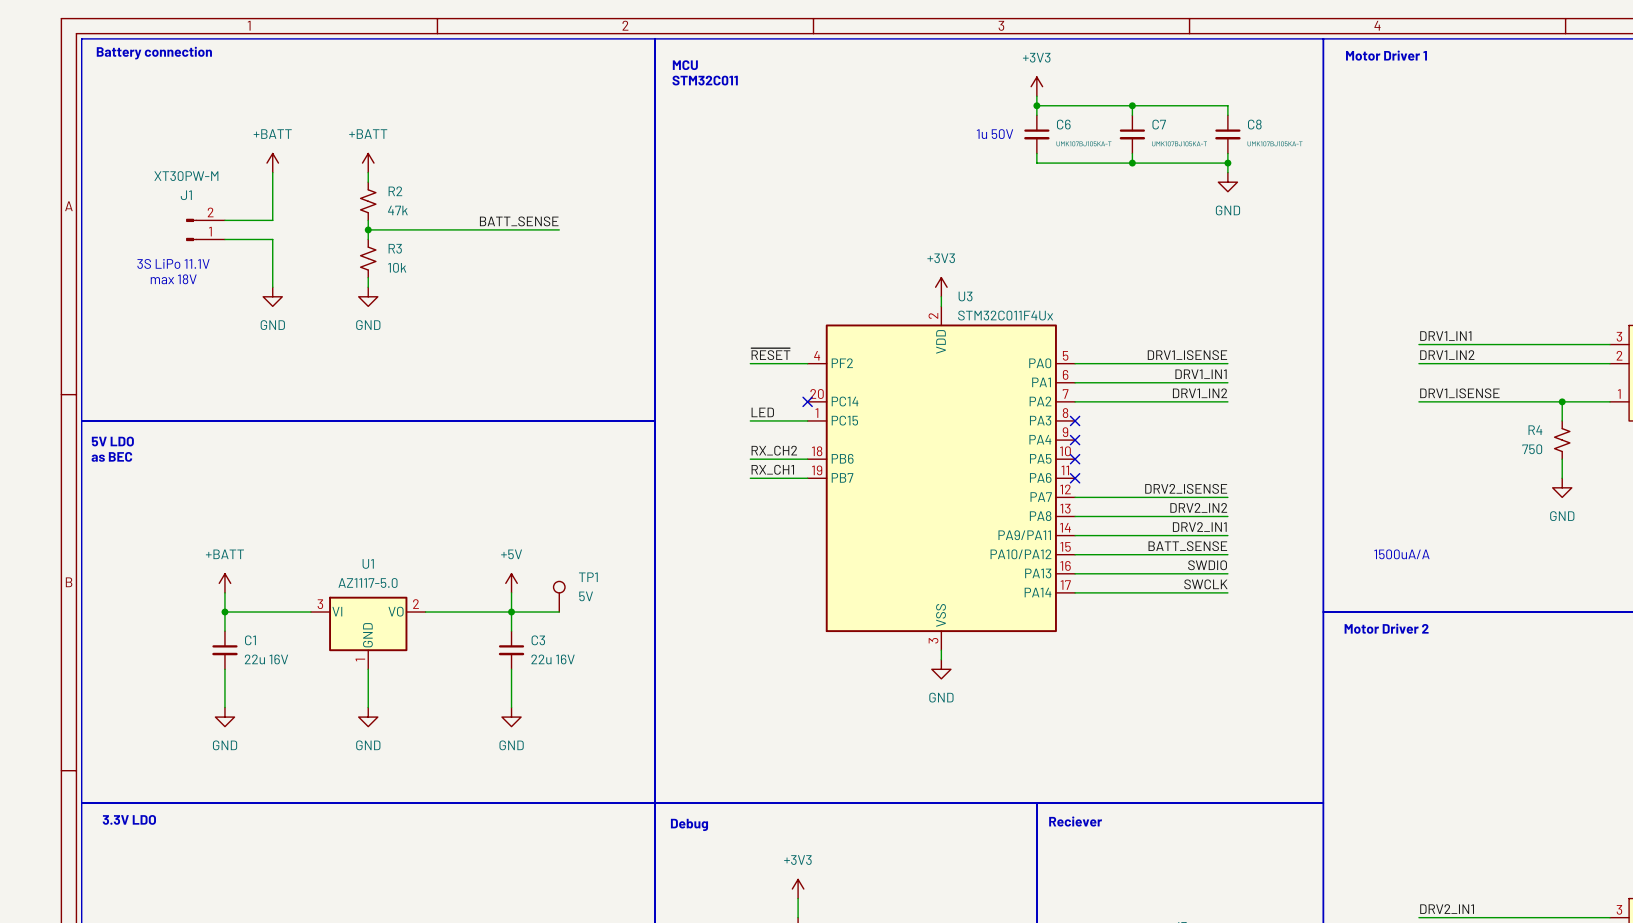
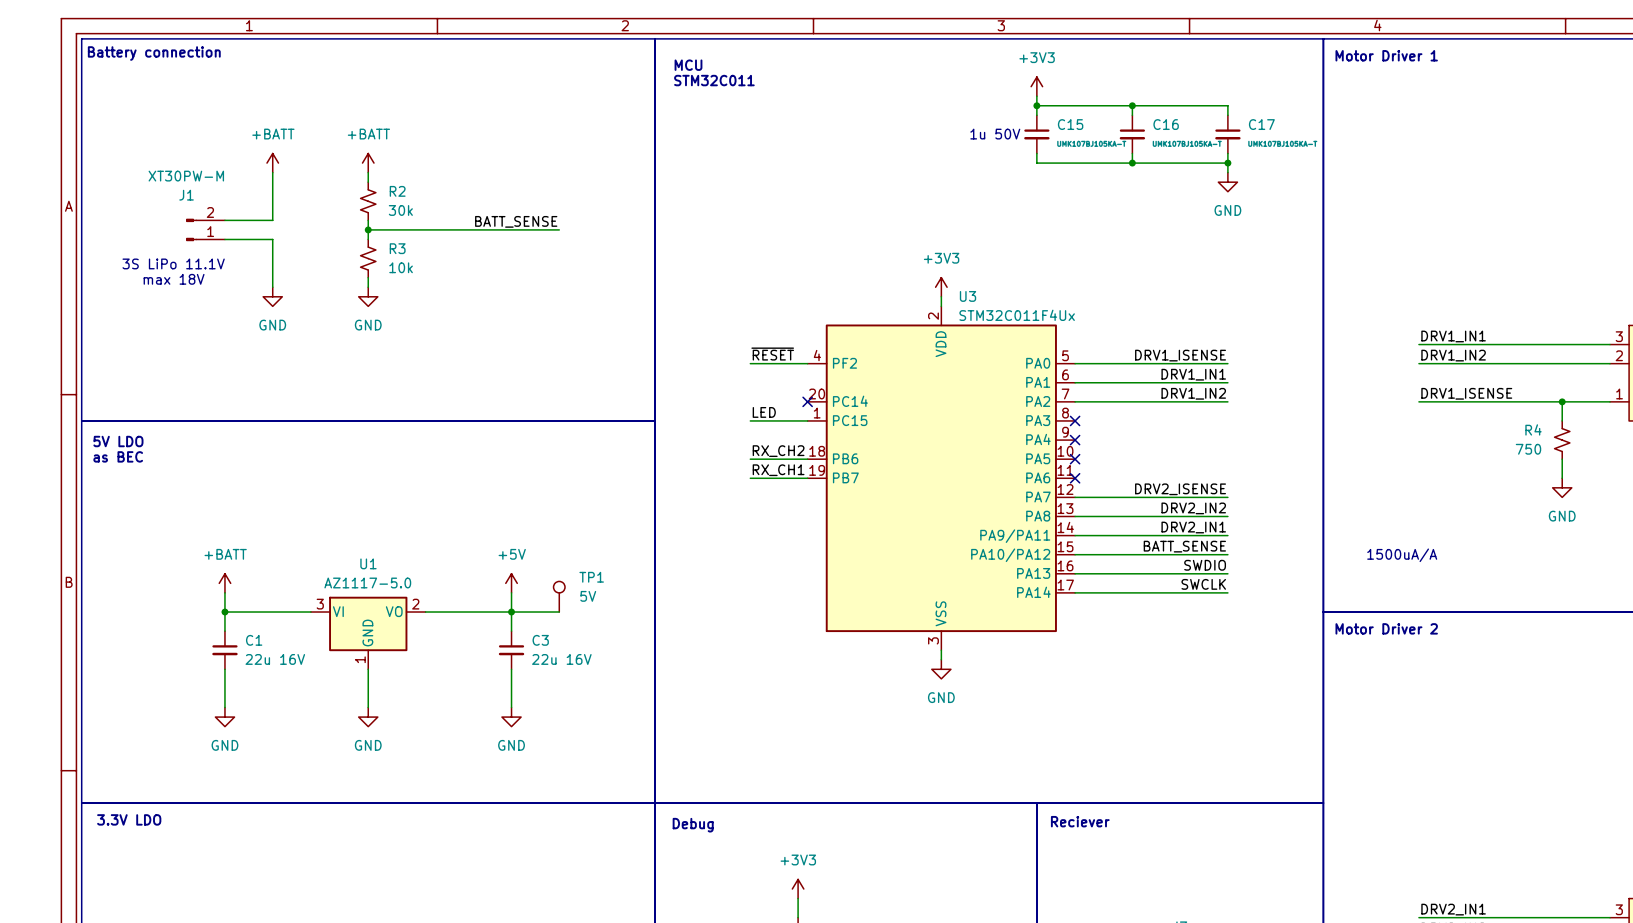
C6 name: C6 (1063, 124) -> C15 (1070, 124)
C7 name: C7 (1159, 124) -> C16 (1166, 124)
C8 name: C8 (1254, 124) -> C17 (1261, 124)
R2 value: 47k (397, 210) -> 30k (400, 210)

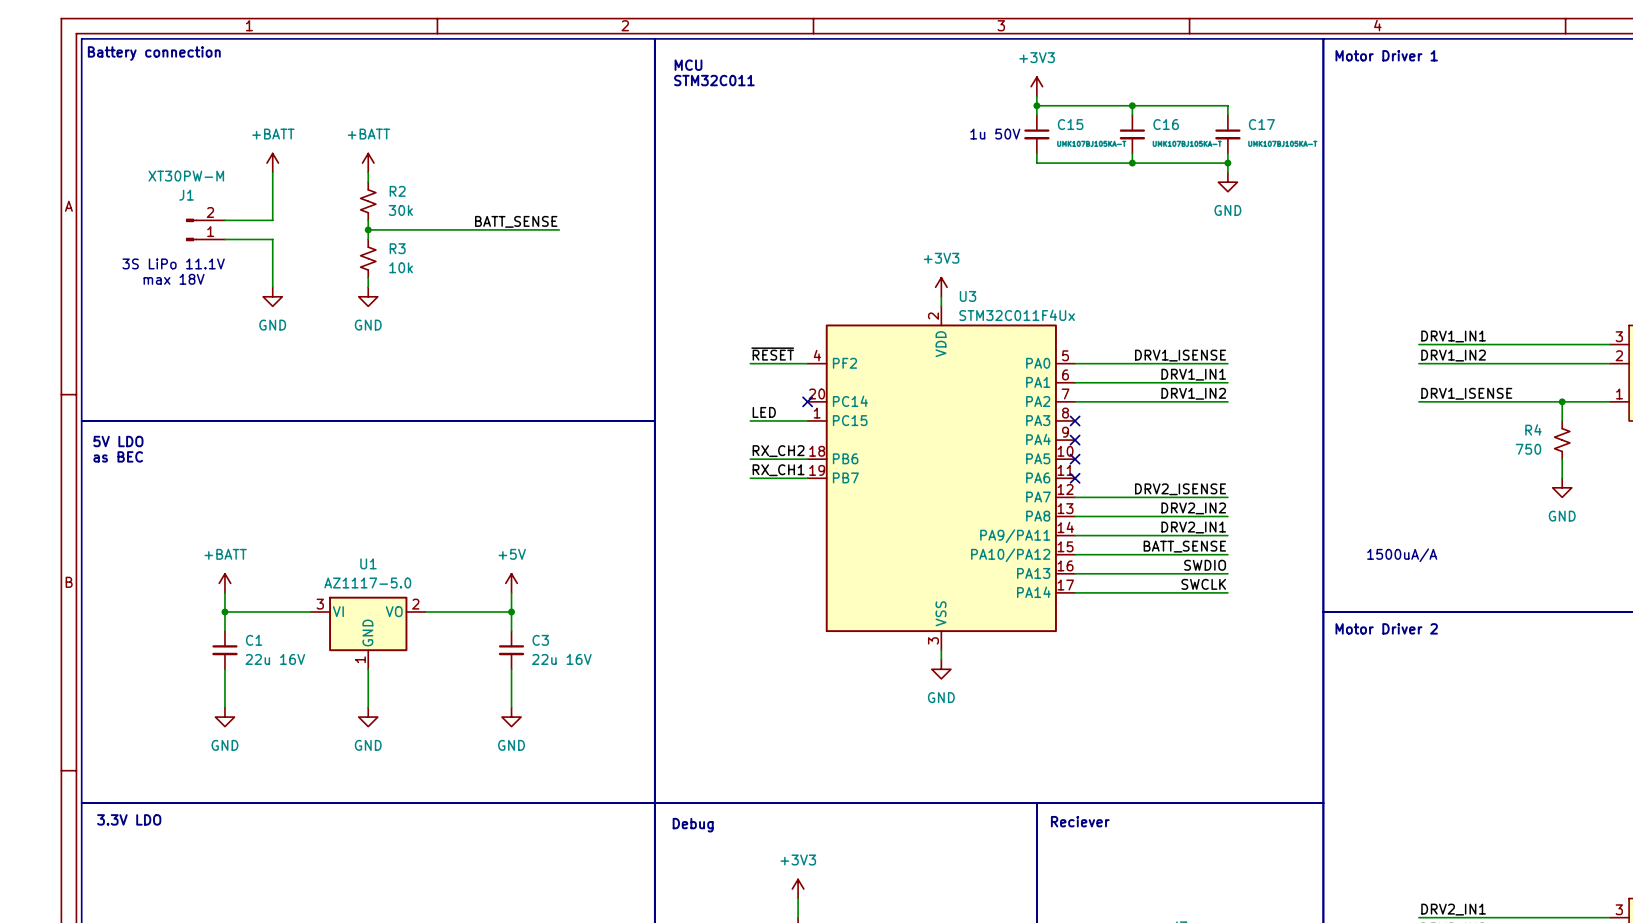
TP1: 5V (559, 596) -> none
wire: (511, 612) (559, 612) -> none

